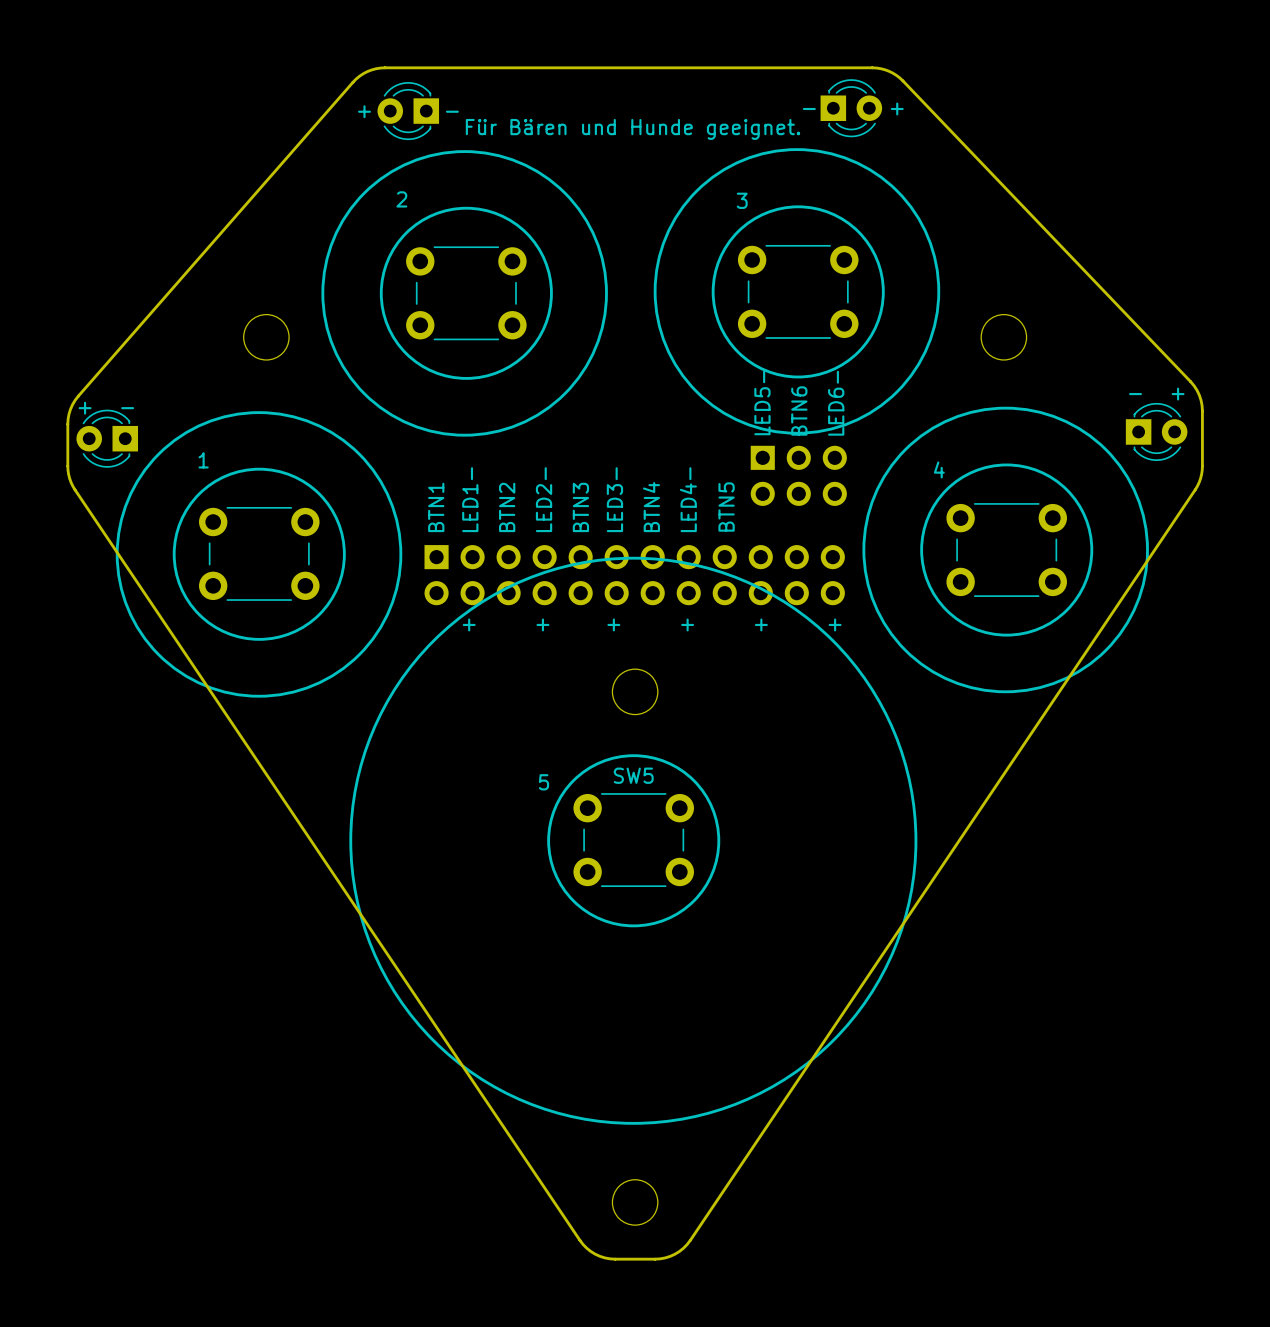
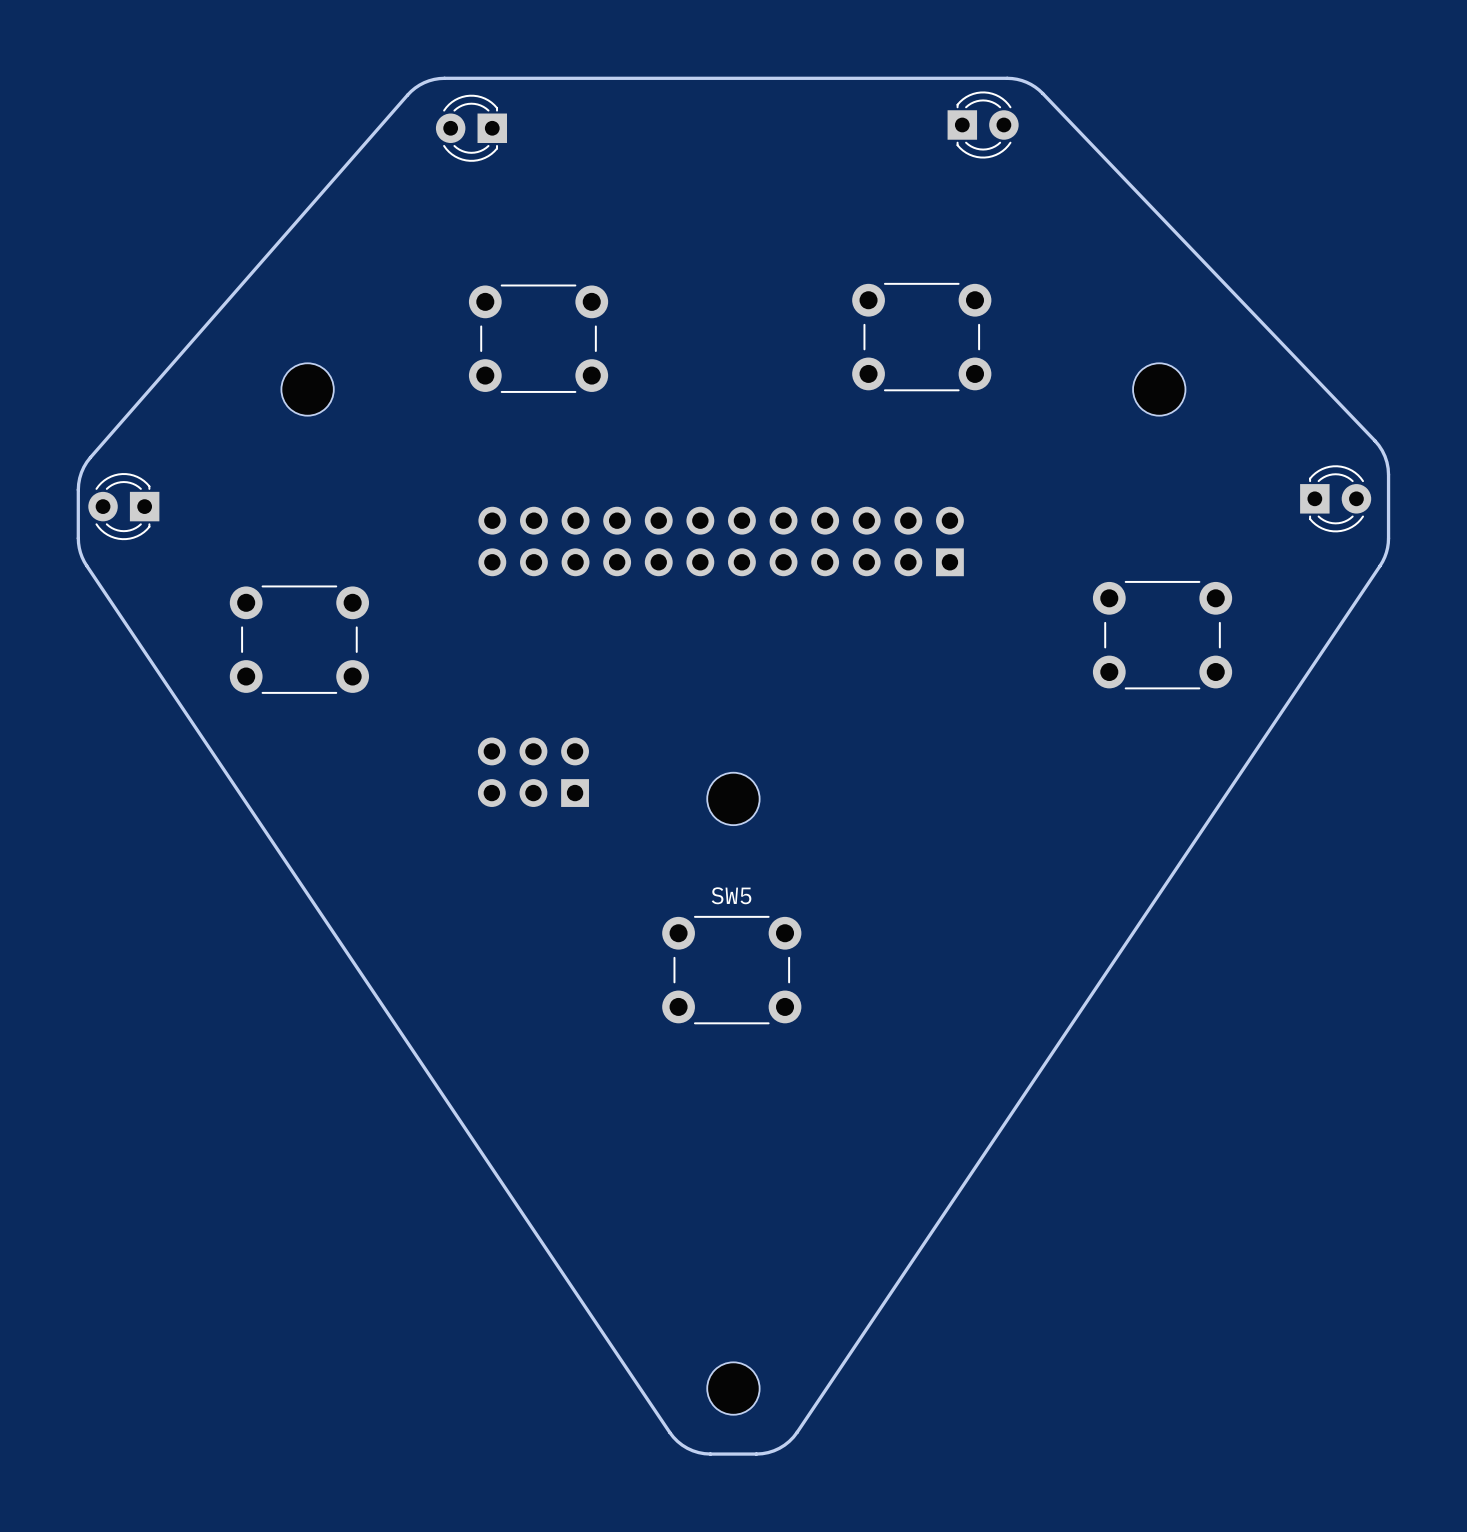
text: - (809, 108) -> none
text: + (897, 108) -> none
text: + (364, 111) -> none
text: - (452, 111) -> none
text: Für Bären und Hunde geeignet. (633, 129) -> none
drawing: [115, 148, 1149, 1125] -> none
text: 2 (401, 199) -> none
text: 3 (742, 200) -> none
text: - (1135, 394) -> none
text: + (1178, 394) -> none
text: LED5- (762, 402) -> none
text: LED6- (836, 403) -> none
text: + (85, 408) -> none
text: - (127, 408) -> none
text: BTN6 (799, 410) -> none
text: 1 (203, 460) -> none
text: 4 (939, 469) -> none
part: (798, 475) -> none
text: LED1- (470, 499) -> none
text: LED2- (544, 499) -> none
text: LED3- (614, 499) -> none
text: LED4- (688, 499) -> none
text: BTN1 (436, 507) -> none
text: BTN2 (507, 507) -> none
text: BTN3 (580, 507) -> none
text: BTN4 (651, 507) -> none
text: BTN5 (726, 507) -> none
part rotation: 0° (634, 575) -> 180° (721, 541)
text: + (469, 624) -> none
text: + (542, 624) -> none
text: + (613, 624) -> none
text: + (687, 624) -> none
text: + (761, 624) -> none
text: + (835, 624) -> none
part: none -> (533, 772)
text: 5 (544, 782) -> none

